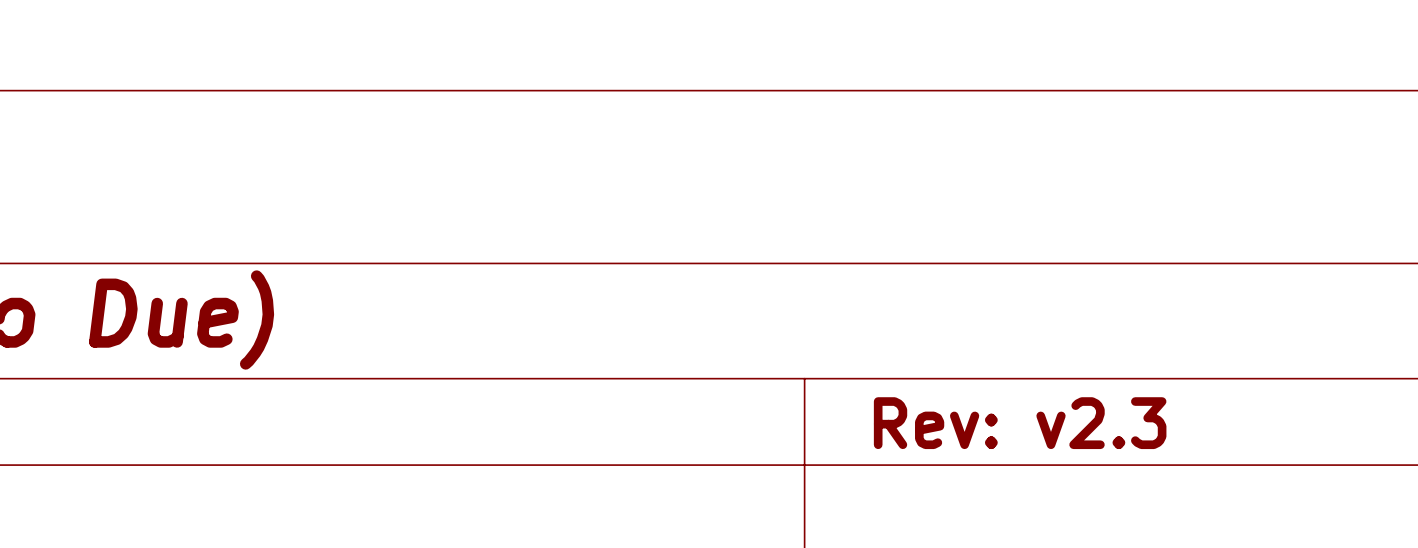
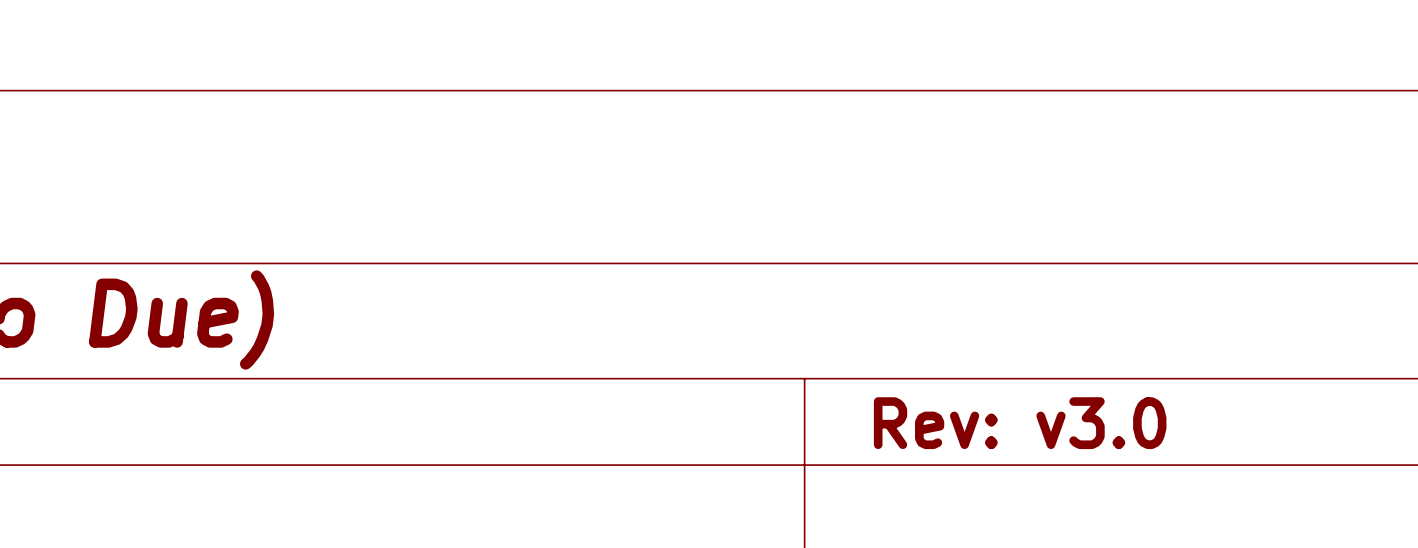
title block: Rev: v2.3 (1020, 423) -> Rev: v3.0 (1020, 423)

